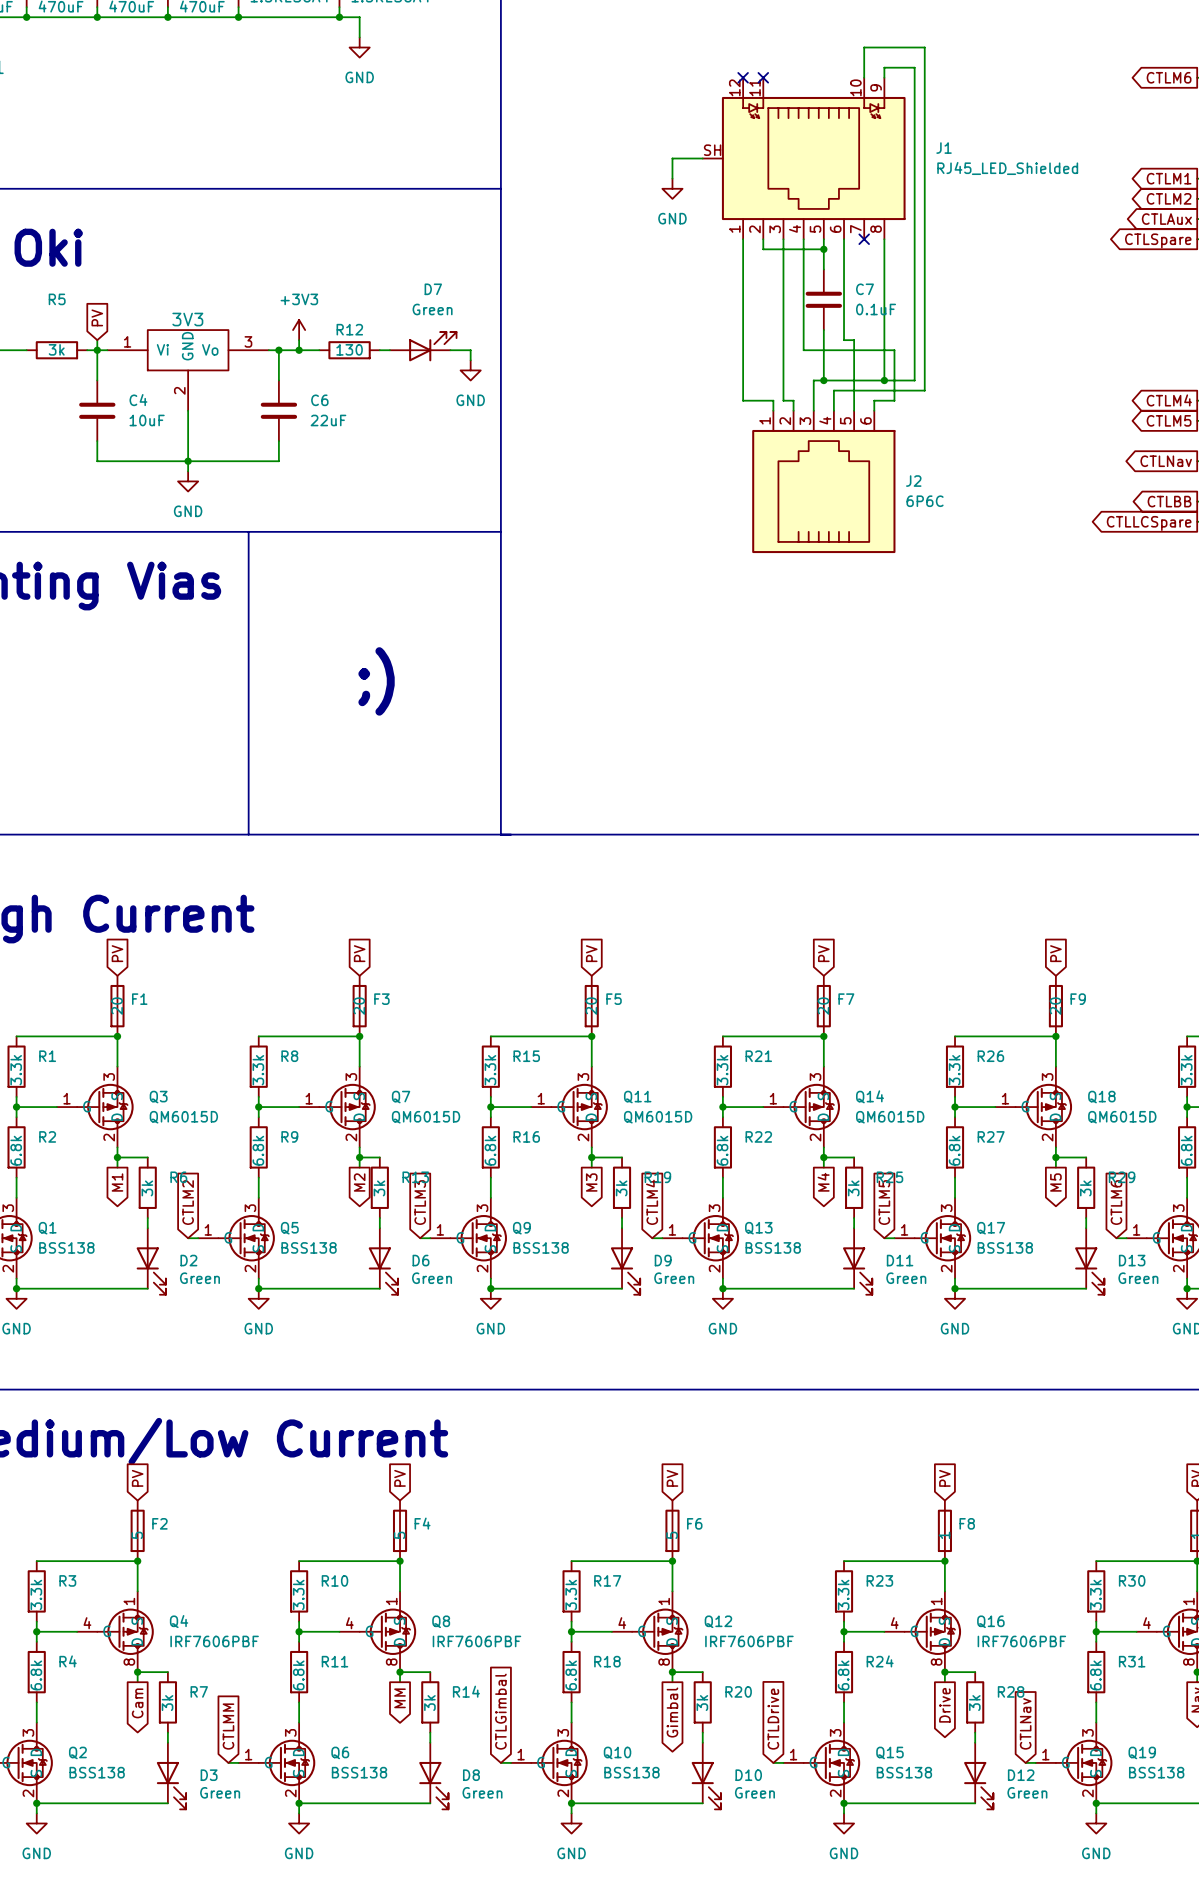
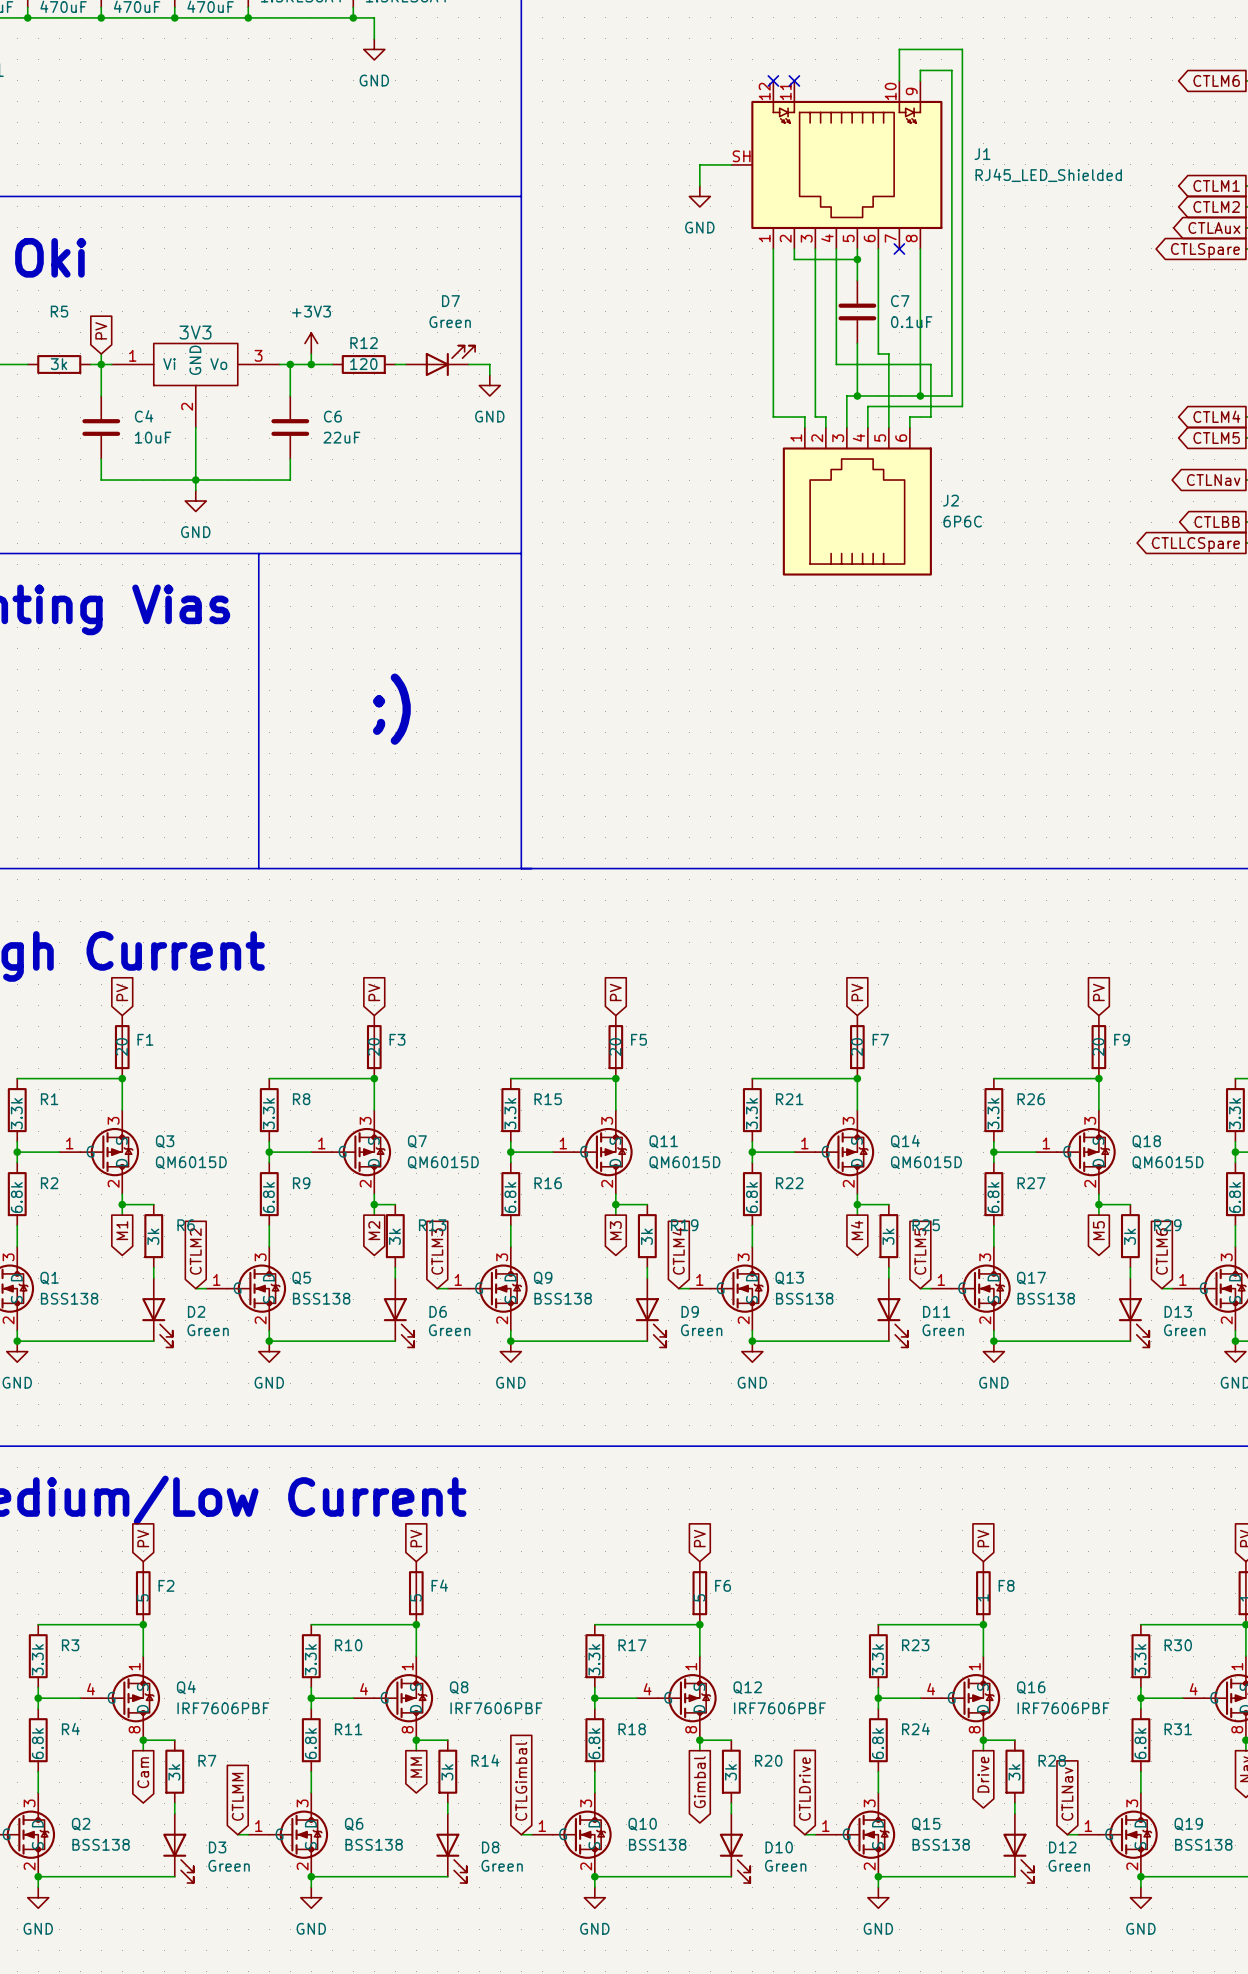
R12 value: 130 (349, 349) -> 120 (363, 364)

